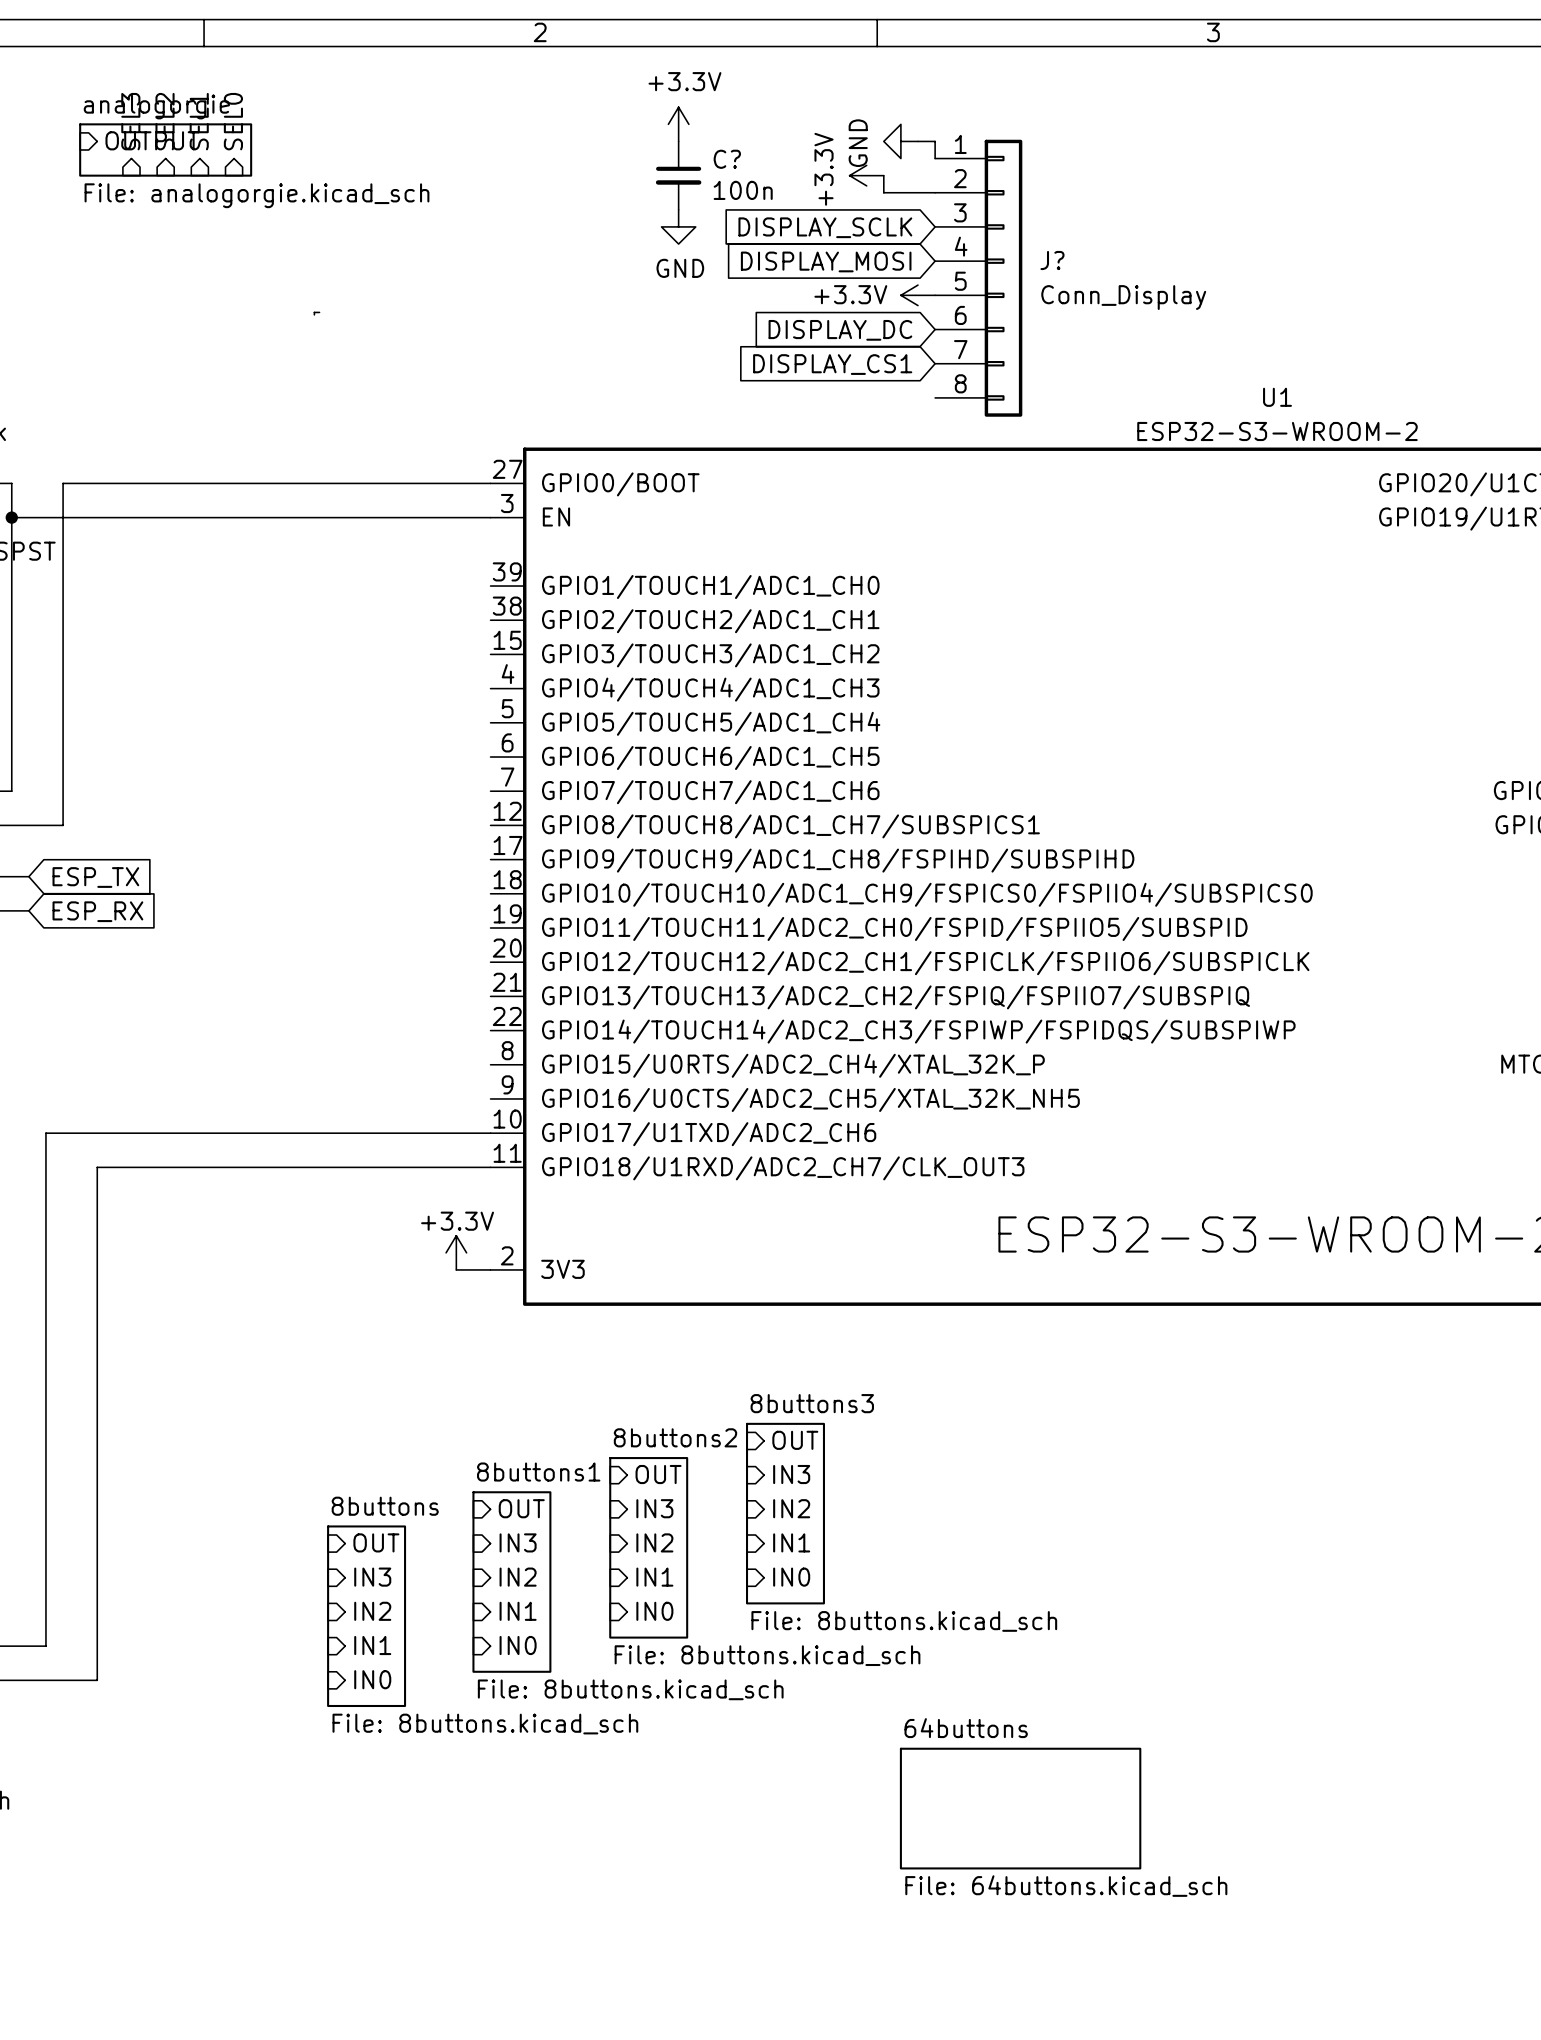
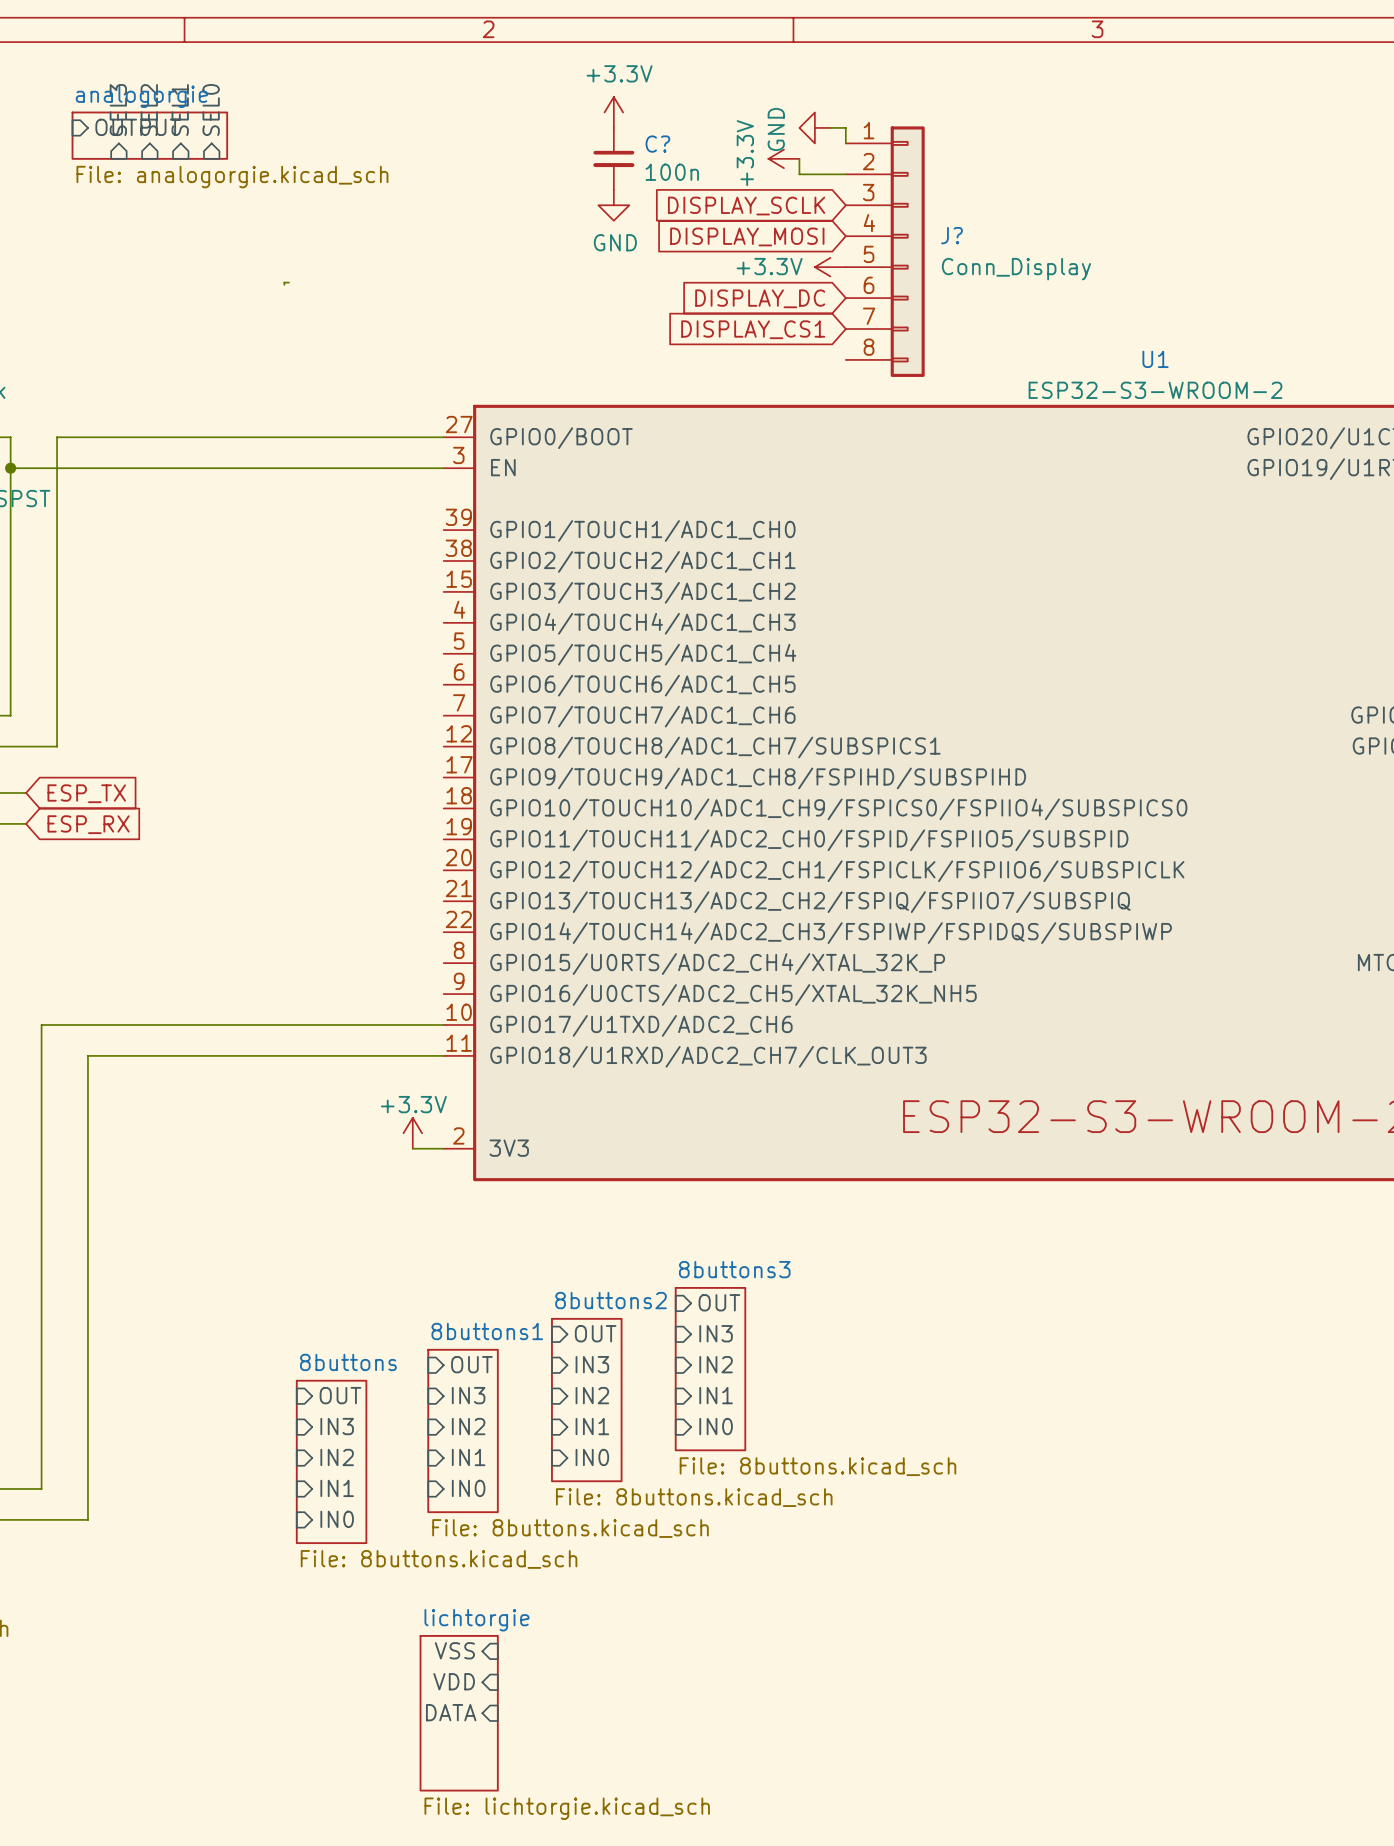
sheet 64buttons: File: 64buttons.kicad_sch (1020, 1808) -> none
sheet pin: none -> VSS (454, 1650)
sheet pin: none -> VDD (454, 1681)
sheet pin: none -> DATA (451, 1712)
sheet lichtorgie: none -> File: lichtorgie.kicad_sch (459, 1713)

